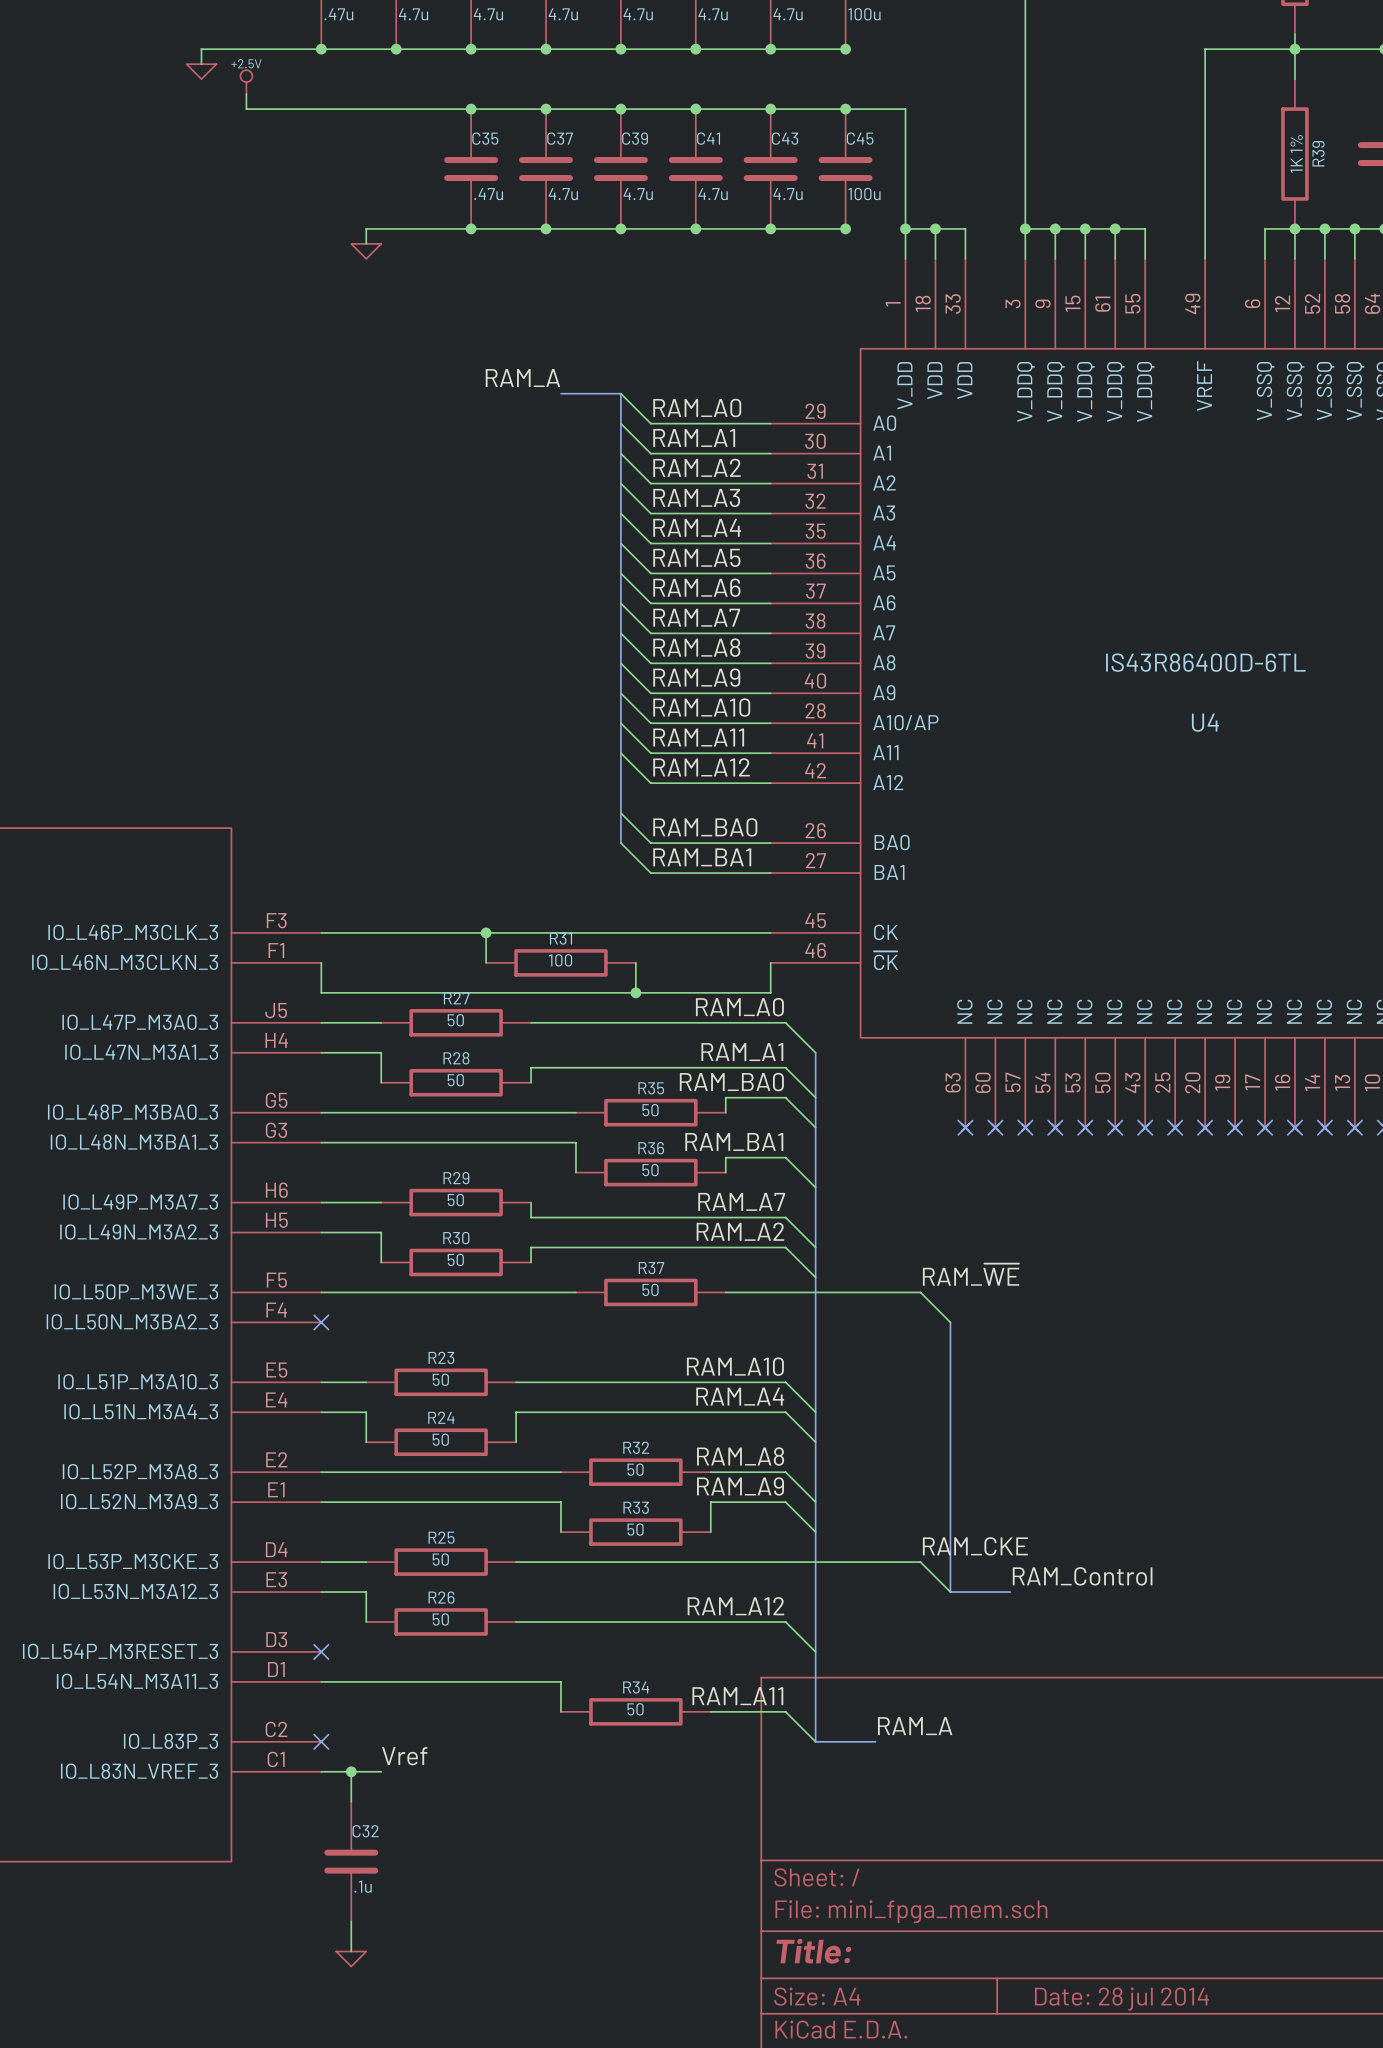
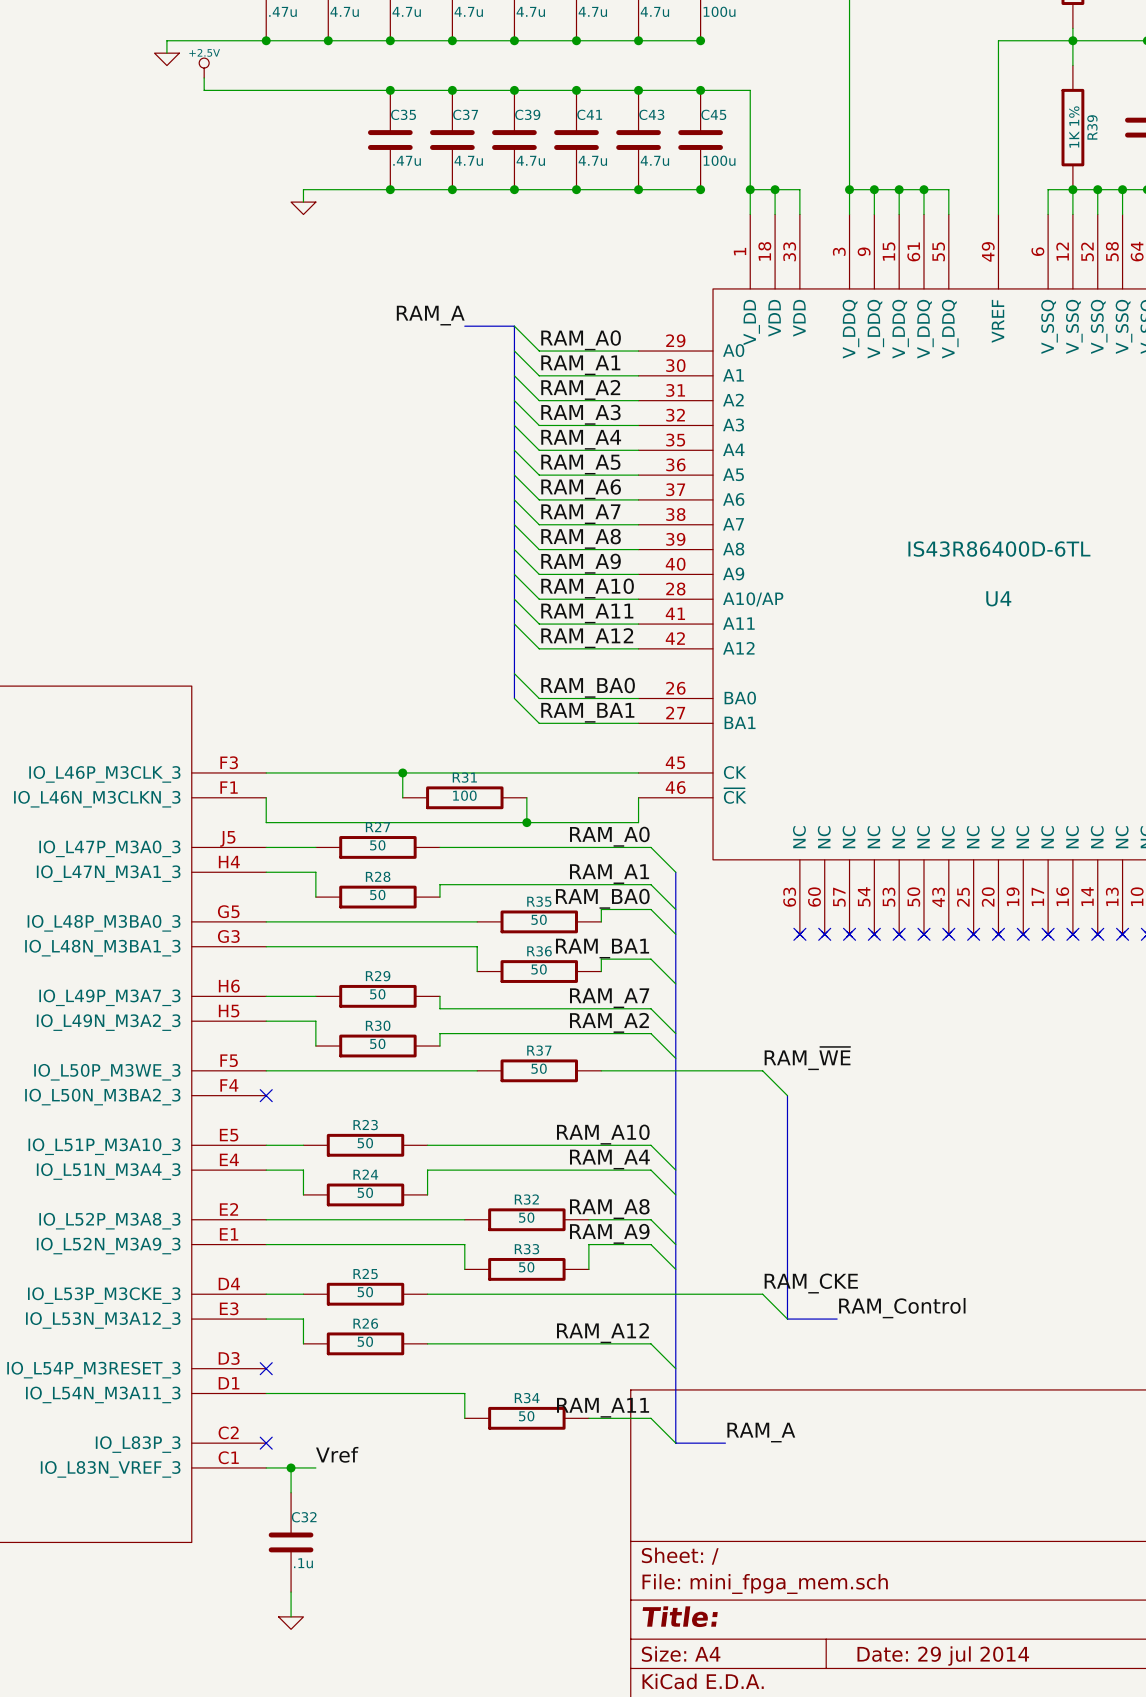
title block: Date: 28 jul 2014 (1121, 1999) -> Date: 29 jul 2014 (943, 1656)

